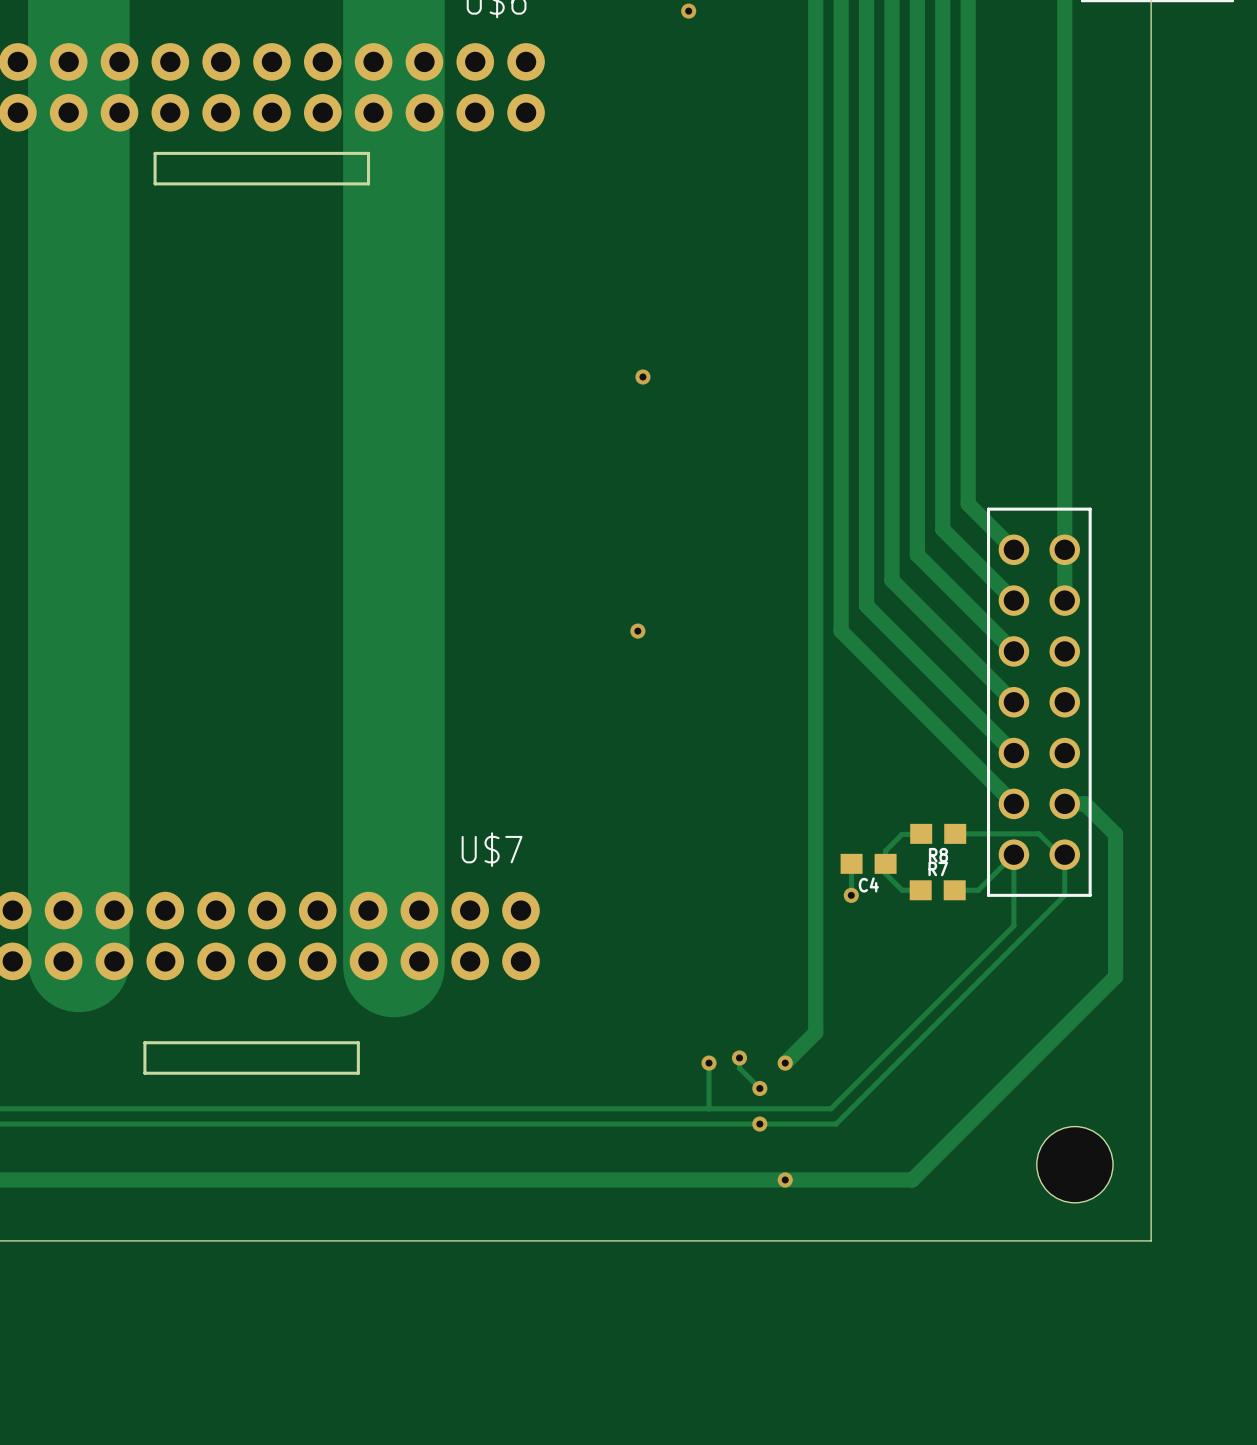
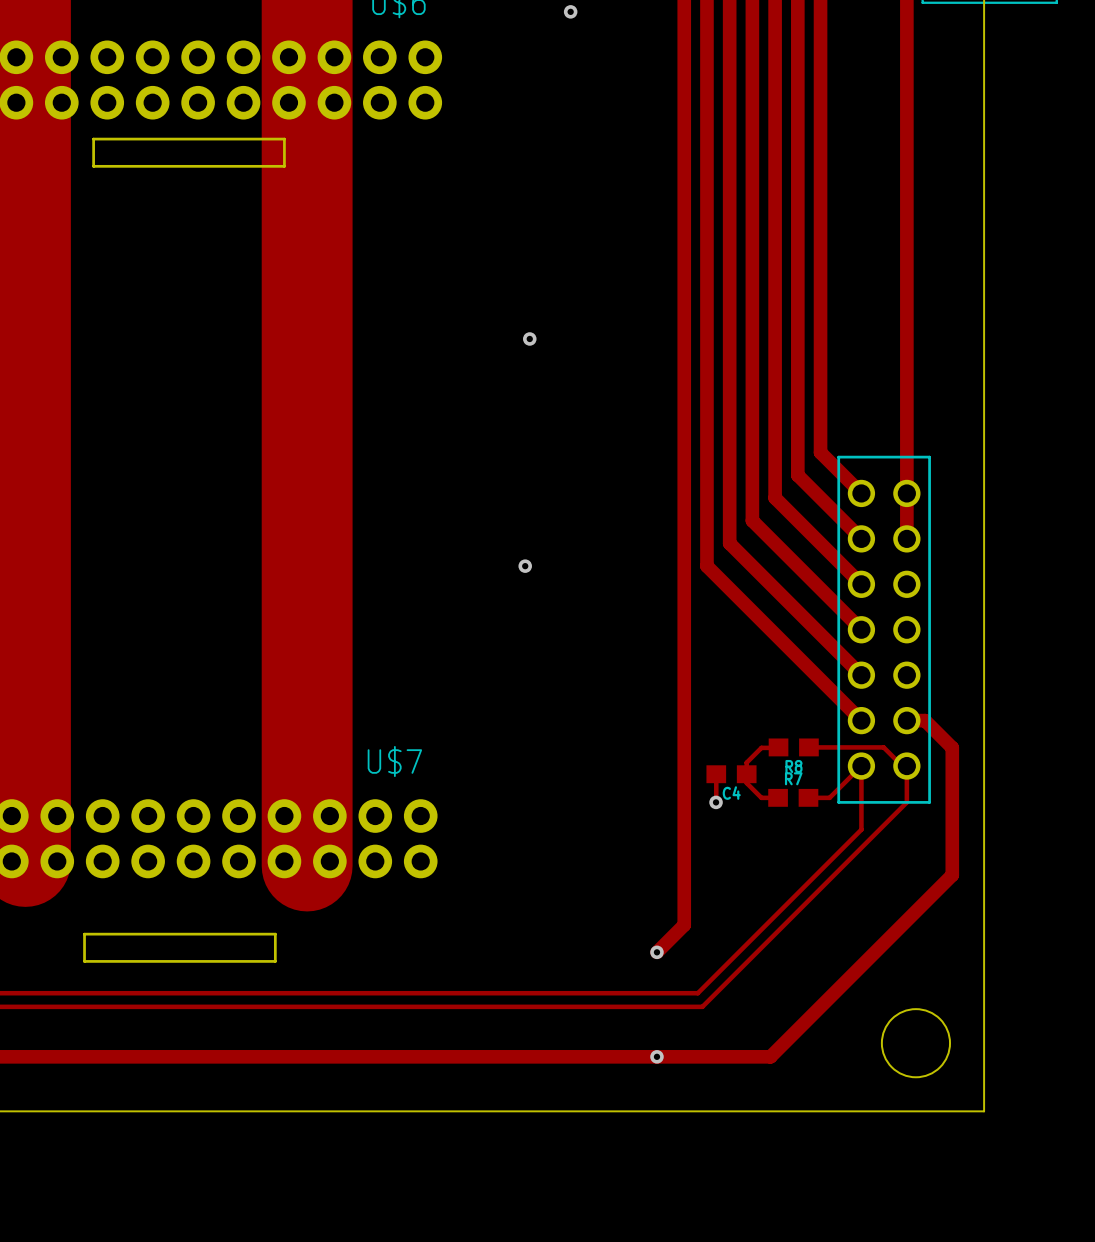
track: (739, 1057) (739, 1068) (759, 1088) -> none
via: (739, 1057) -> none
track: (709, 1063) (709, 1108) -> none
via: (709, 1063) -> none
via: (759, 1088) -> none
via: (759, 1124) -> none

